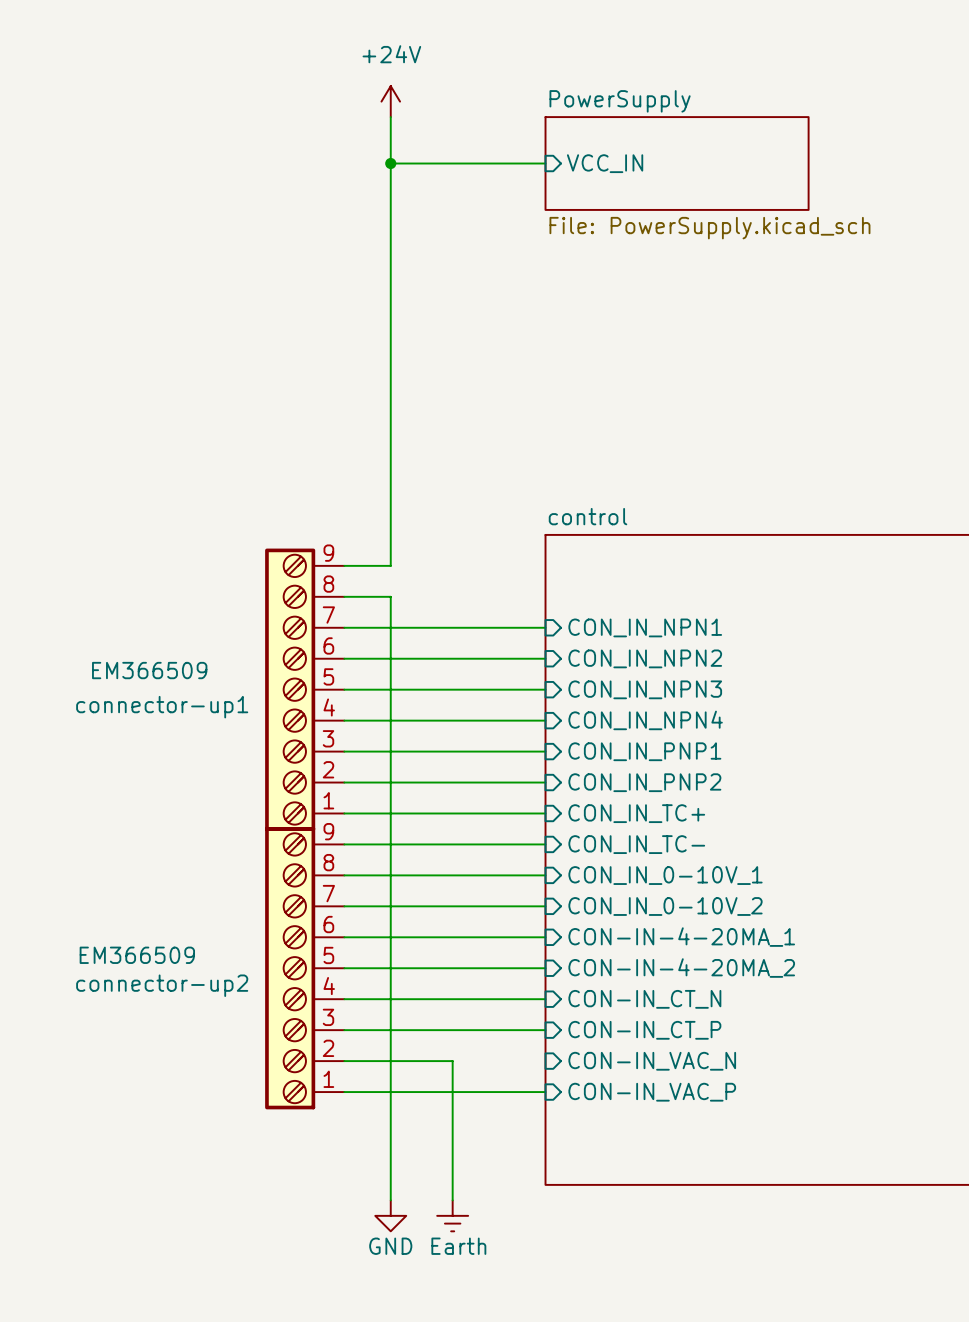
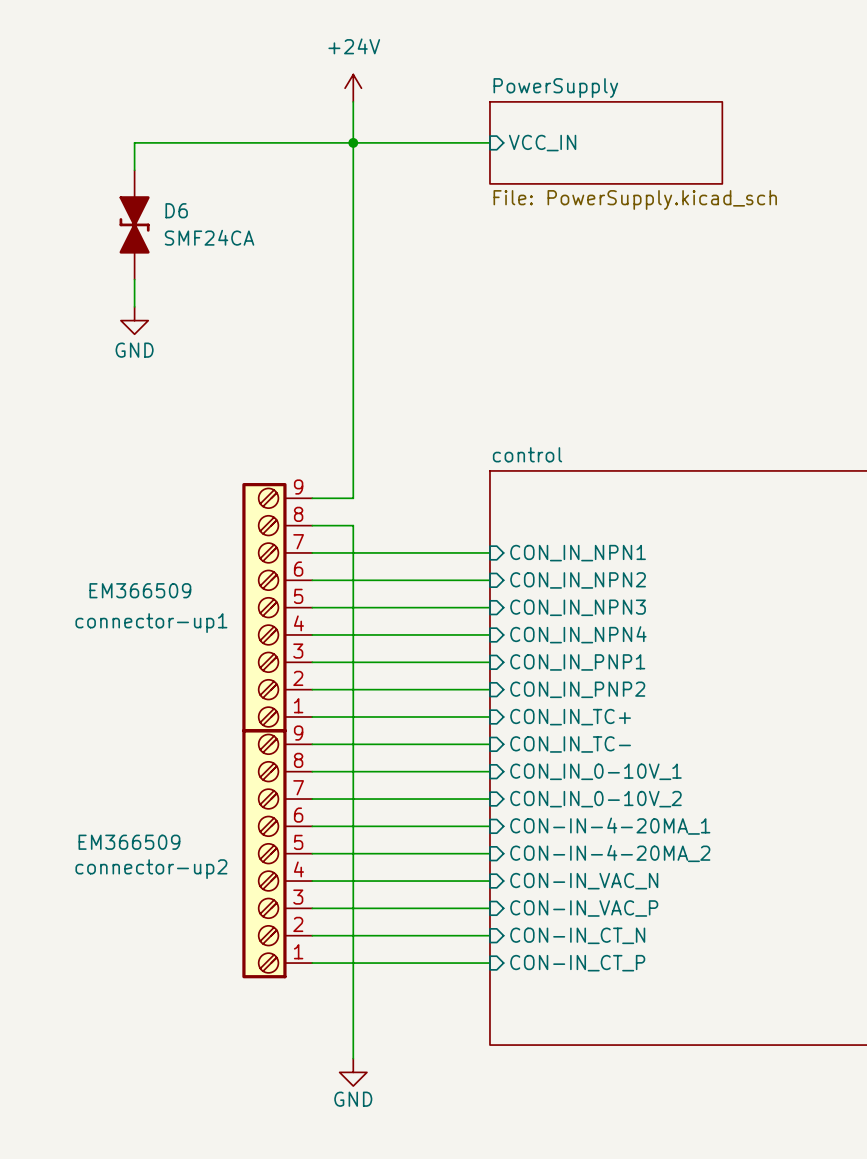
wire: none -> (353, 142) (134, 142) (134, 170)
D6: none -> SMF24CA (134, 224)
wire: none -> (134, 279) (134, 306)
power symbol: none -> GND (134, 320)
sheet pin: CON-IN_CT_N (644, 999) -> CON-IN_VAC_N (584, 881)
sheet pin: CON-IN_CT_P (644, 1030) -> CON-IN_VAC_P (584, 908)
wire: (452, 1061) (452, 1200) -> (407, 935) (489, 935)
sheet pin: CON-IN_VAC_N (652, 1061) -> CON-IN_CT_N (577, 935)
sheet pin: CON-IN_VAC_P (652, 1092) -> CON-IN_CT_P (577, 963)
power symbol: Earth (452, 1215) -> none

